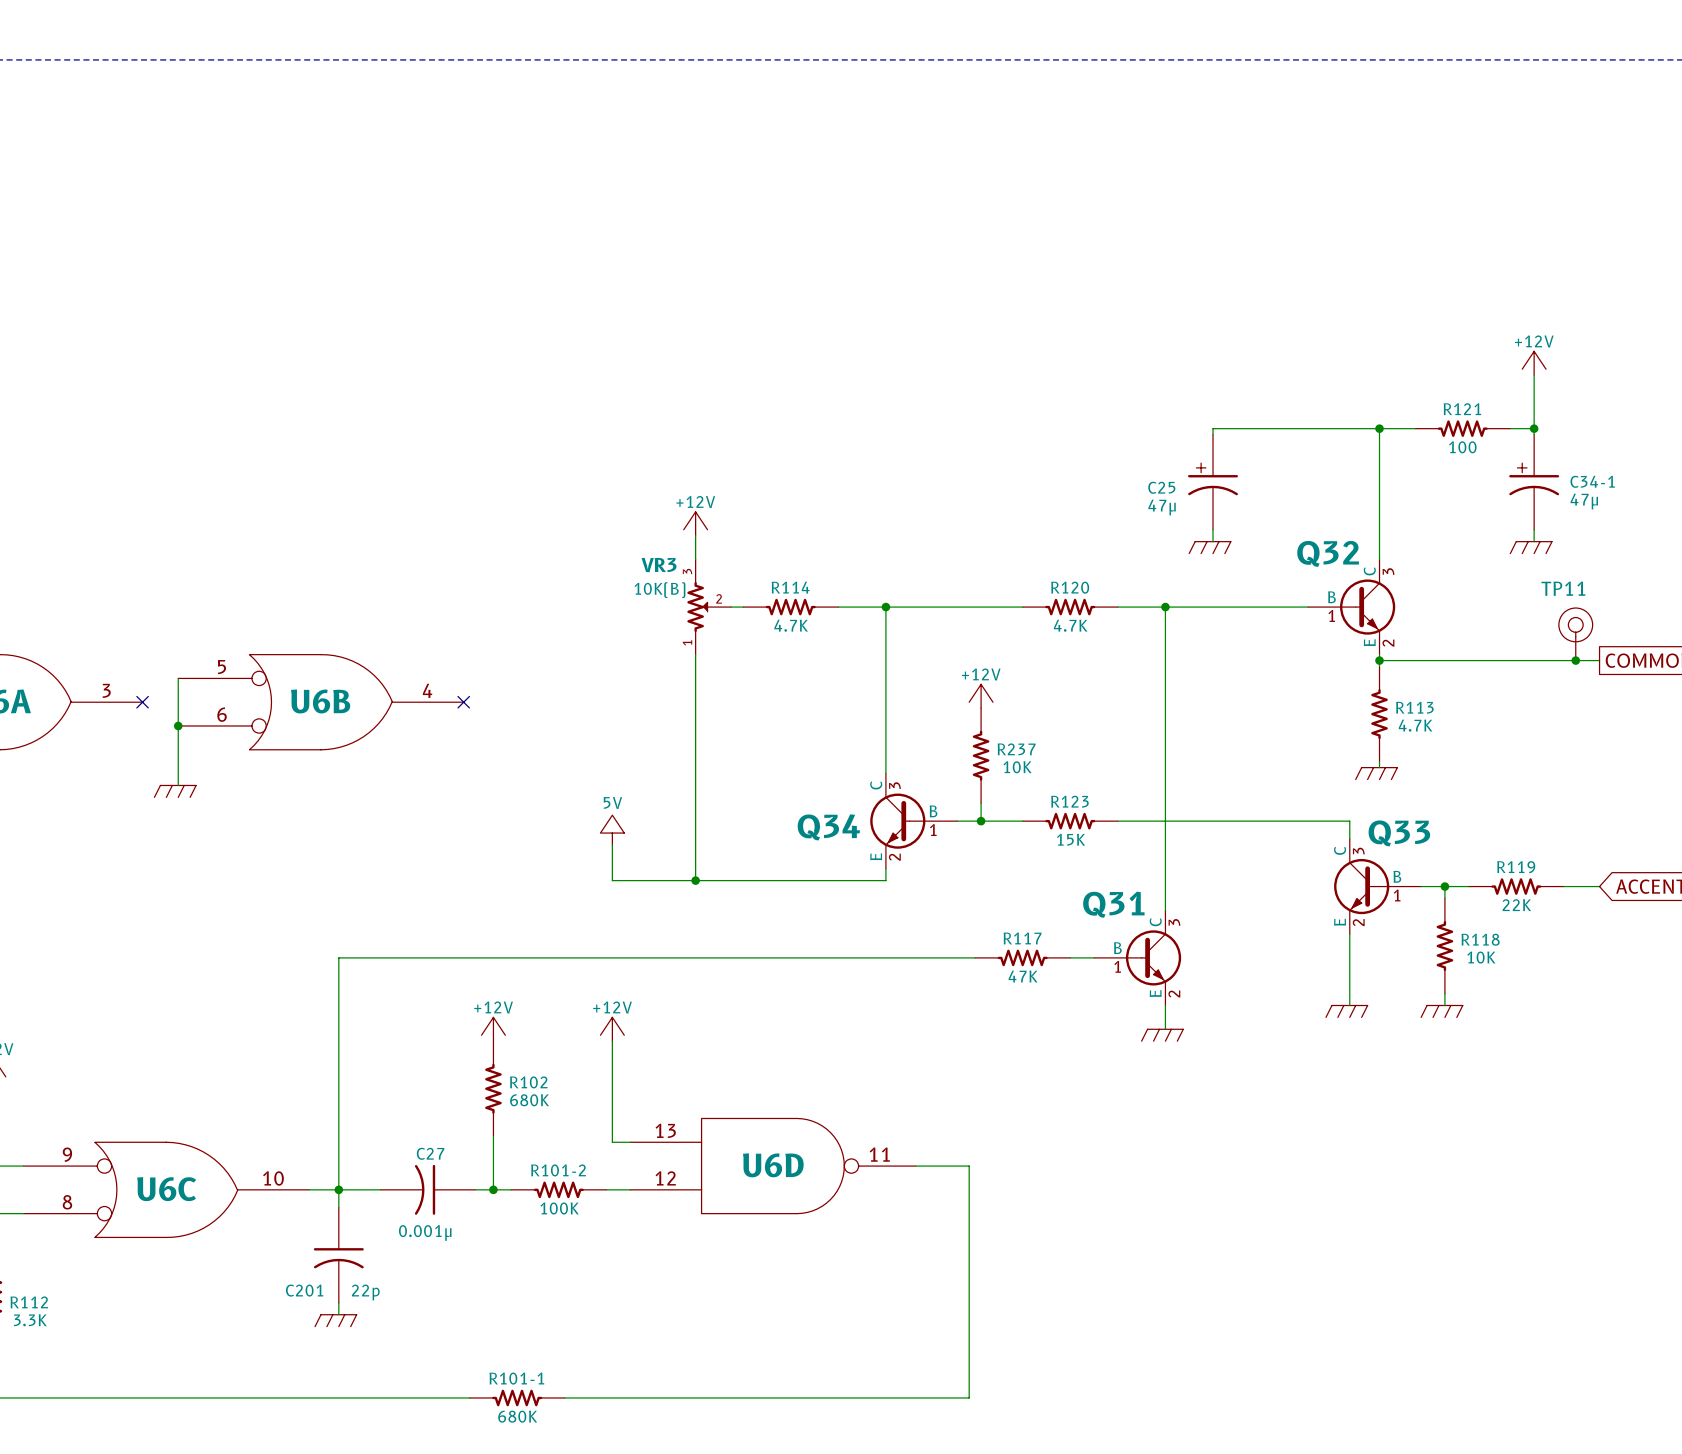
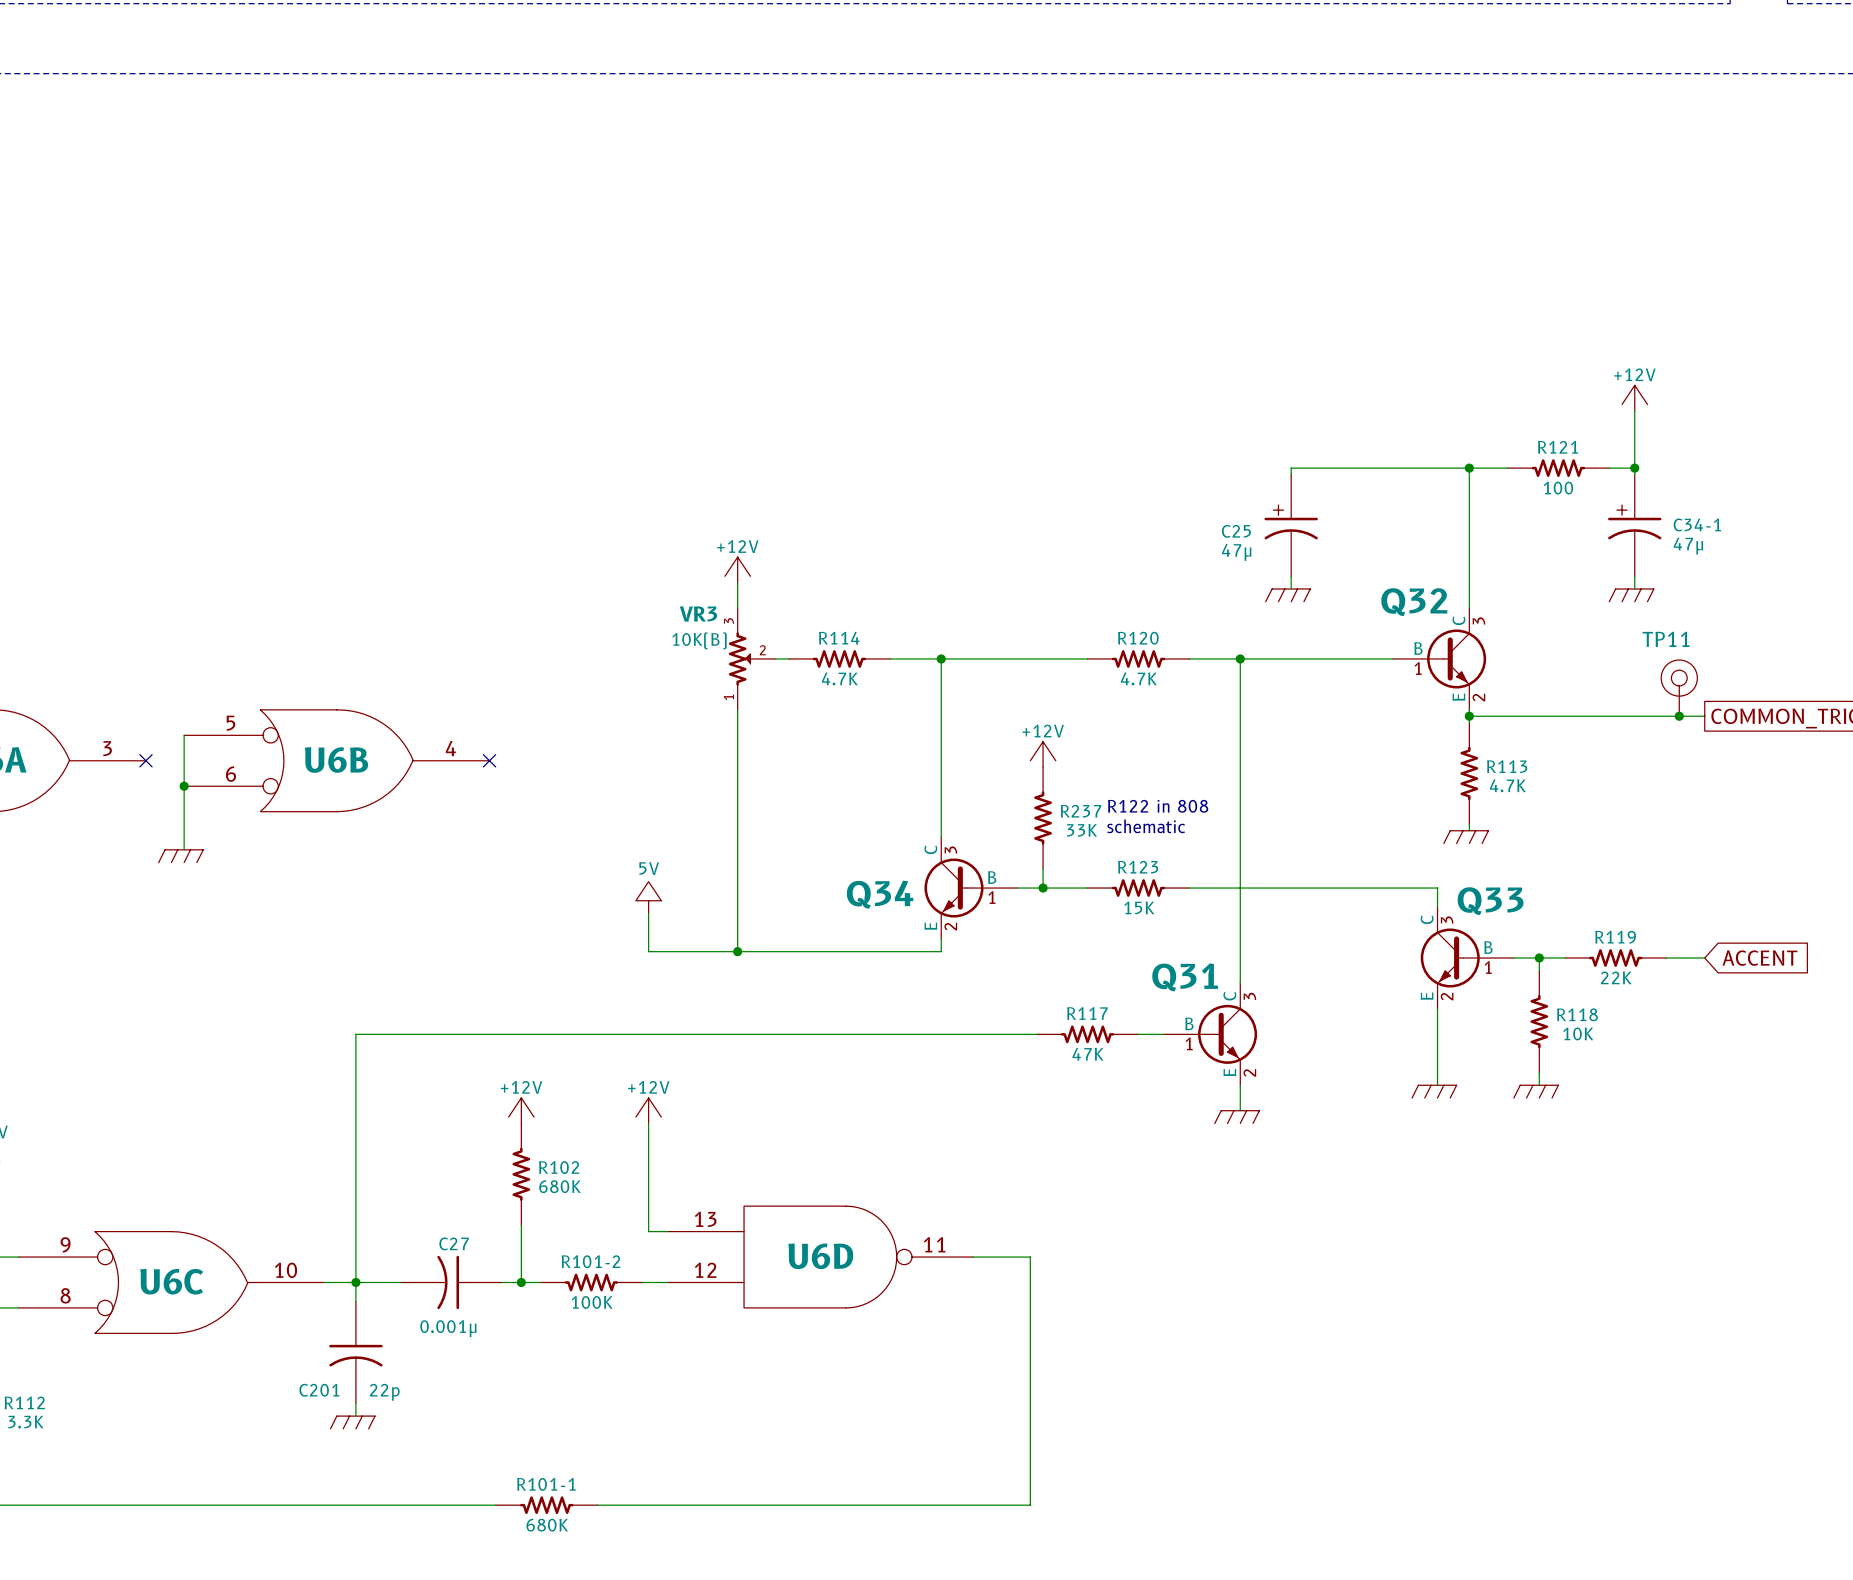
text: none -> R122 in 808 (1158, 806)
text: none -> schematic (1146, 826)
R237 value: 10K (1017, 767) -> 33K (1082, 830)

